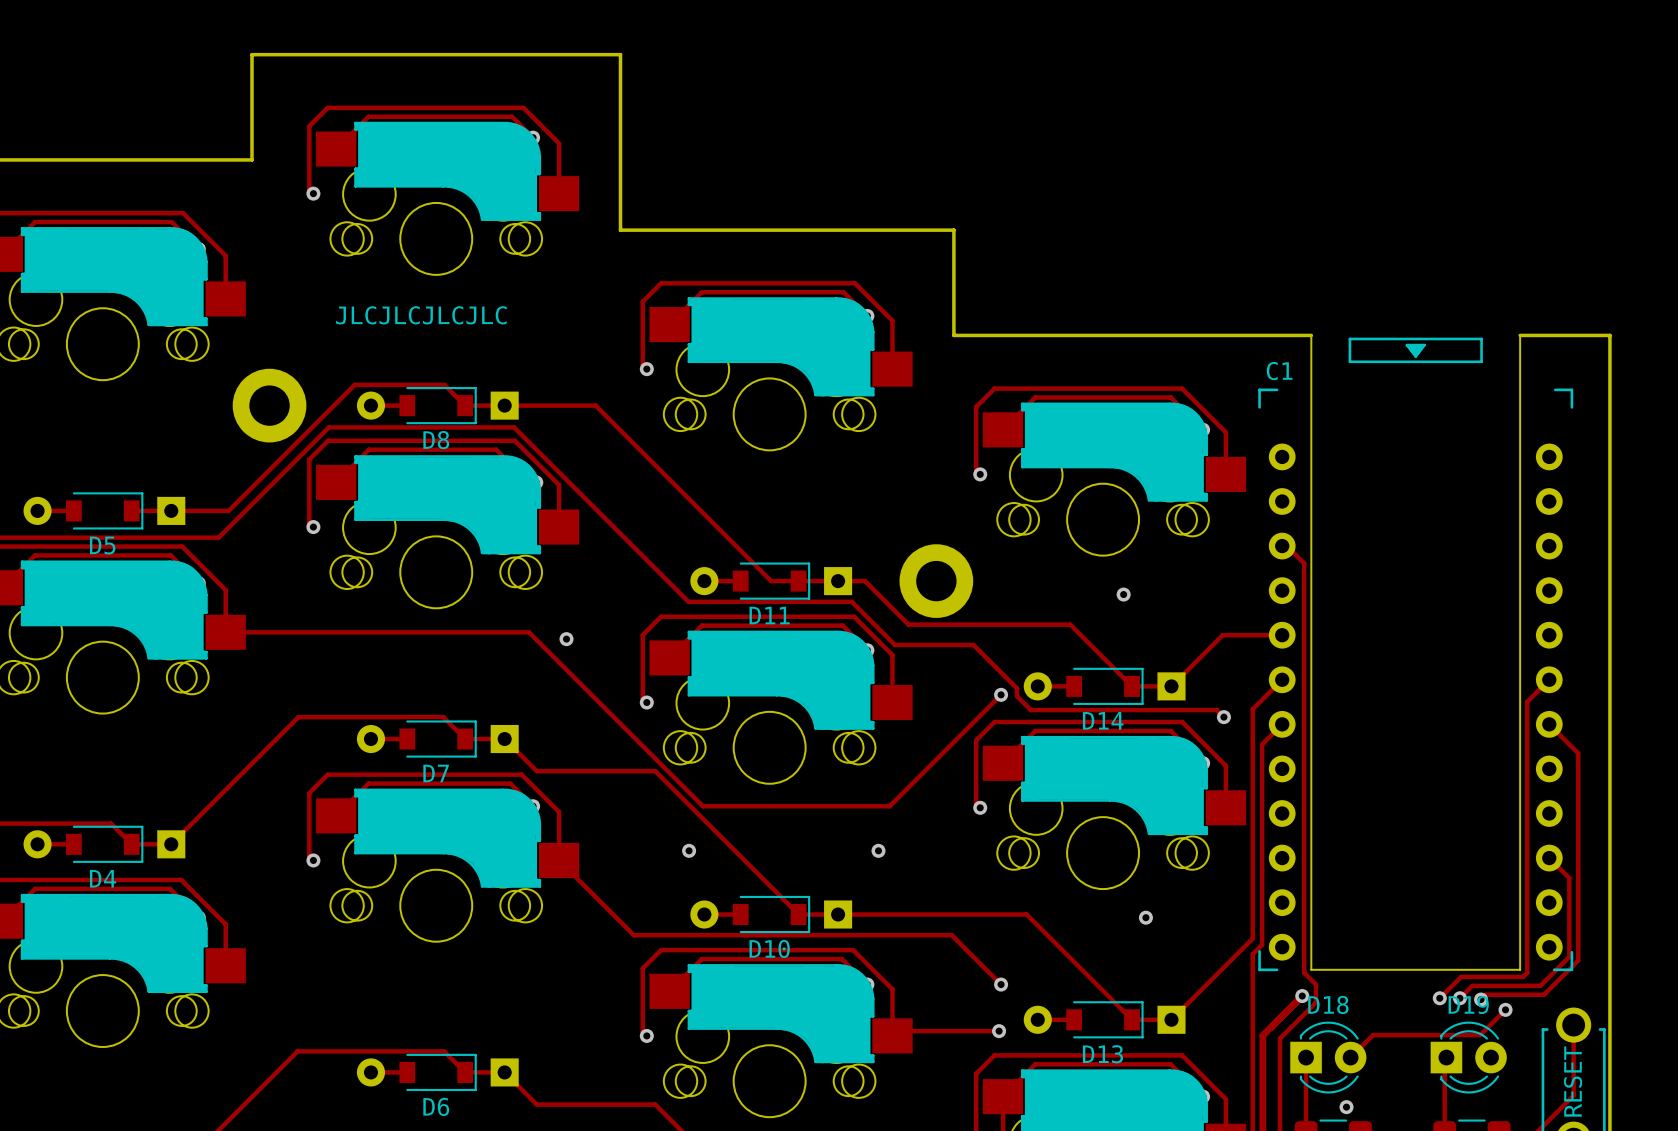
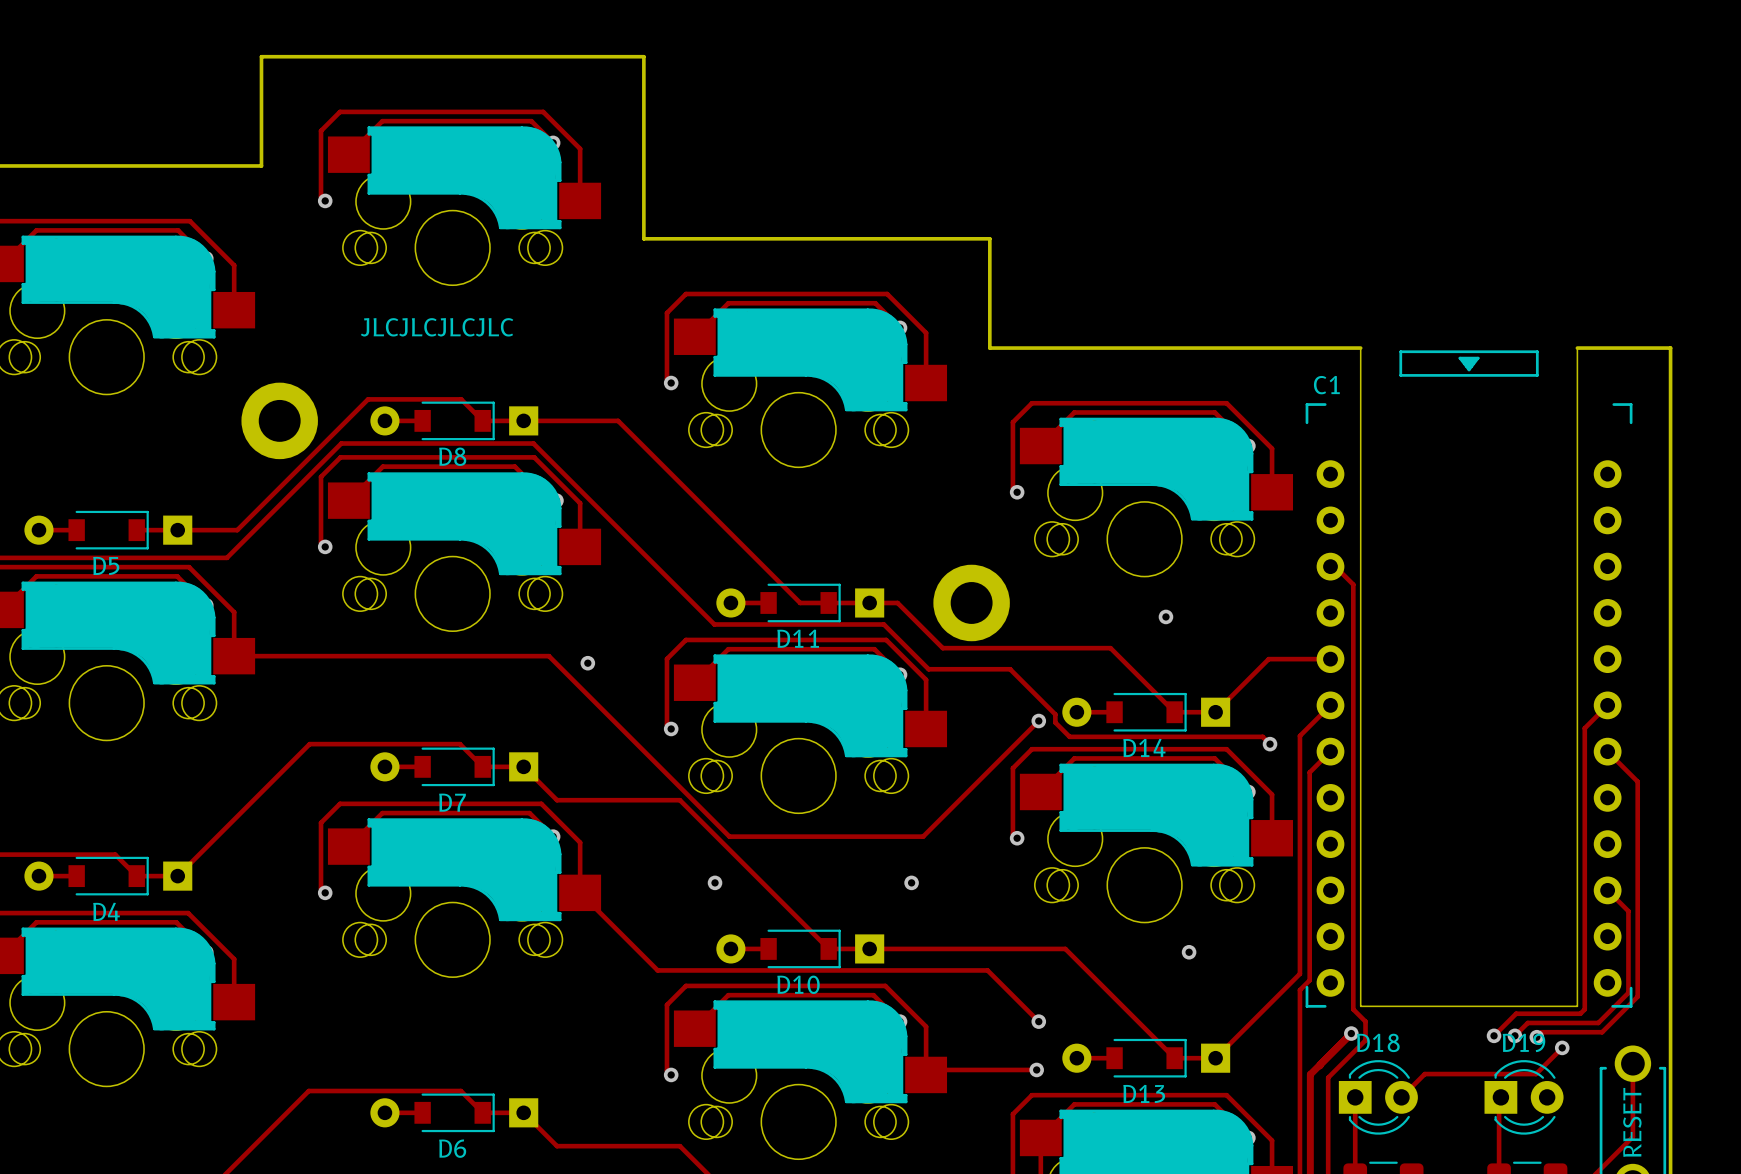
via: (1346, 1107) -> none

